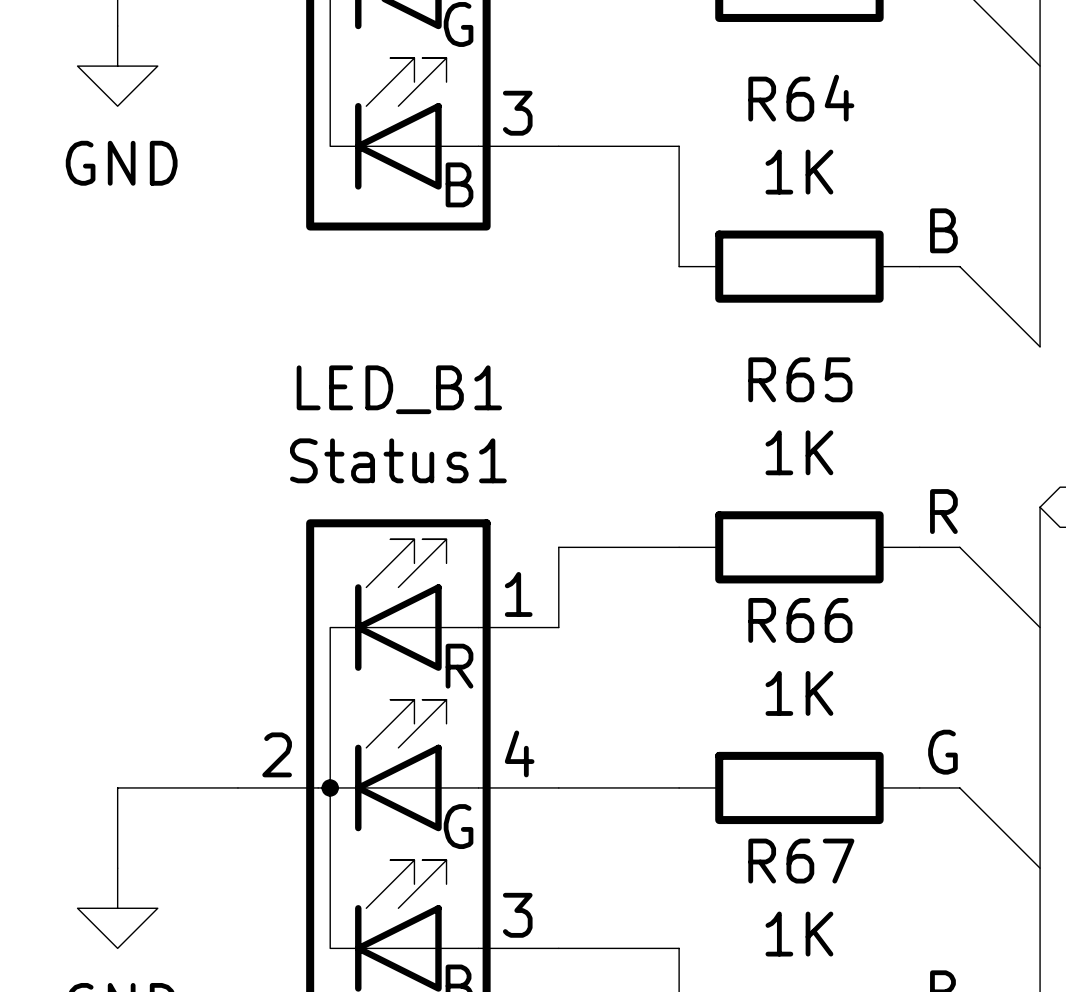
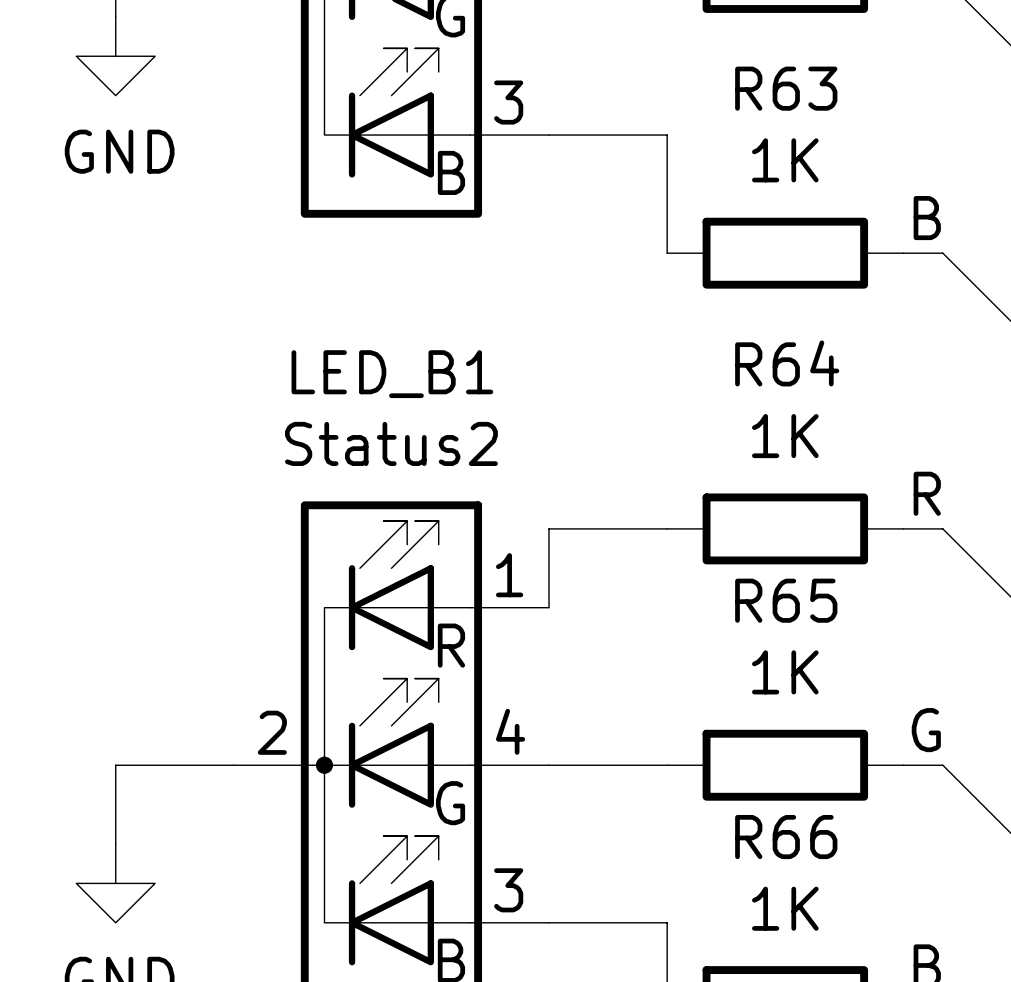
R64 name: R64 (801, 98) -> R63 (786, 88)
R65 name: R65 (800, 379) -> R64 (787, 363)
LED_B1 value: Status1 (398, 460) -> Status2 (391, 443)
R66 name: R66 (800, 620) -> R65 (786, 600)
R67 name: R67 (801, 861) -> R66 (786, 837)

